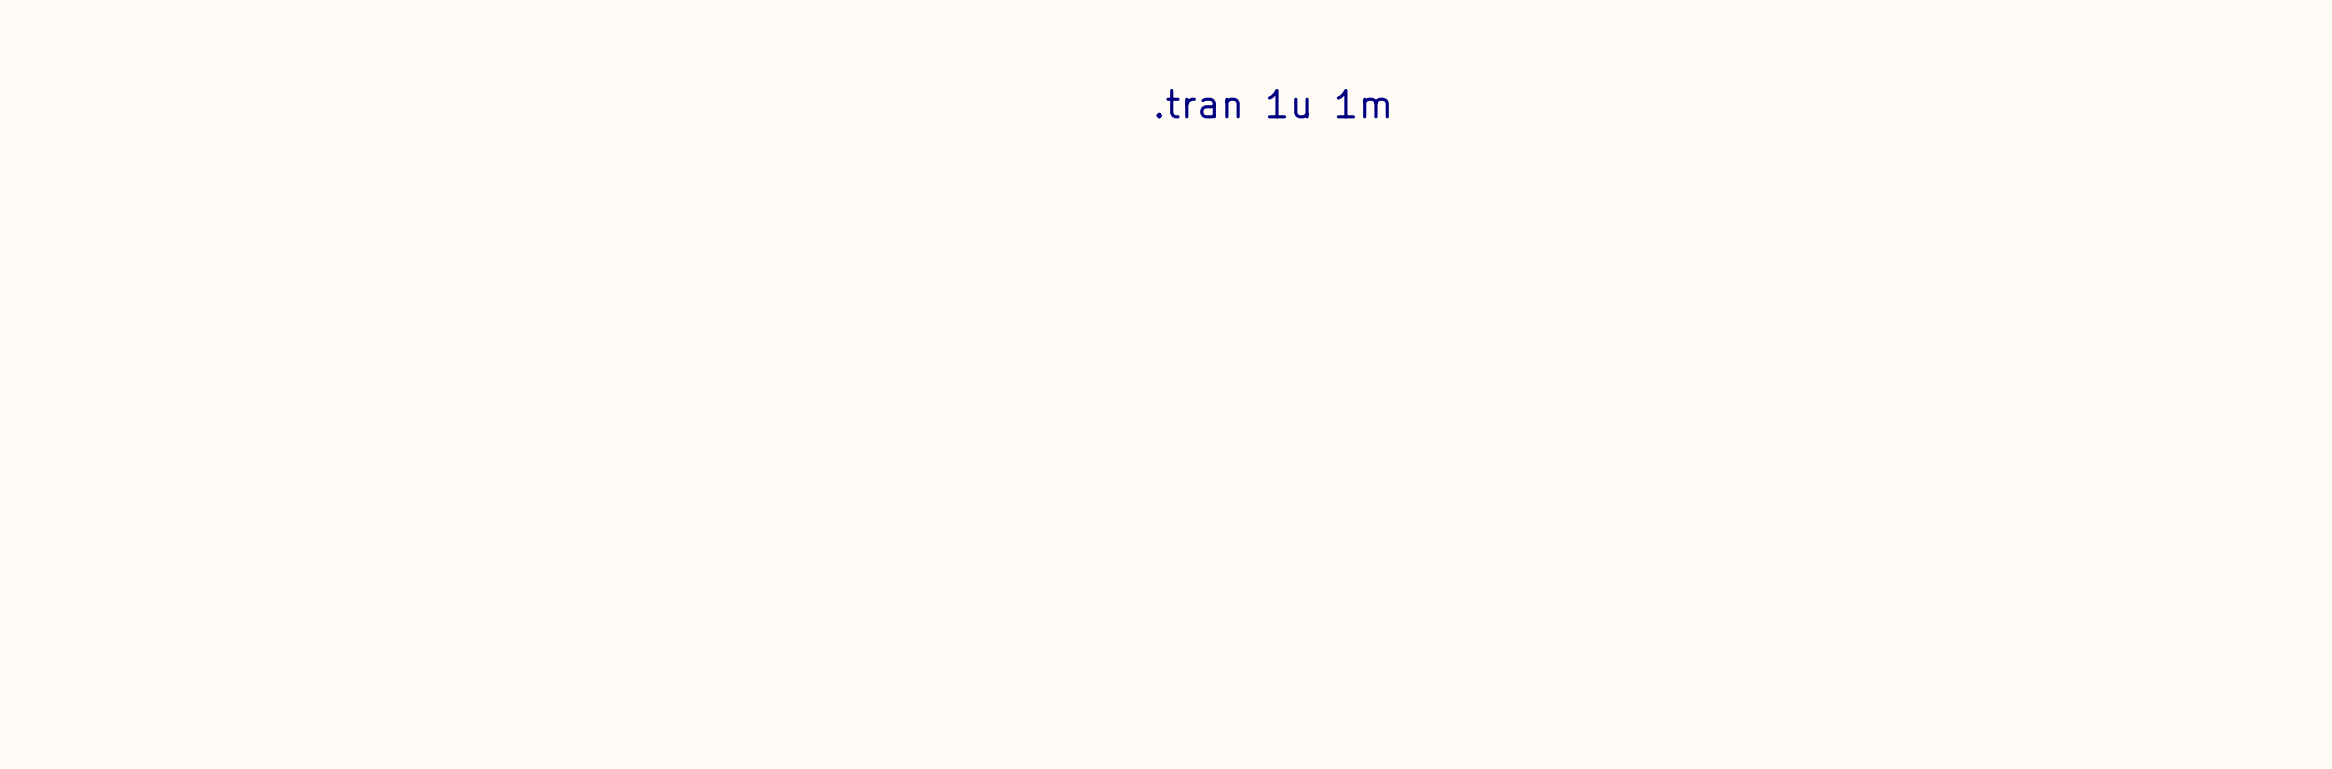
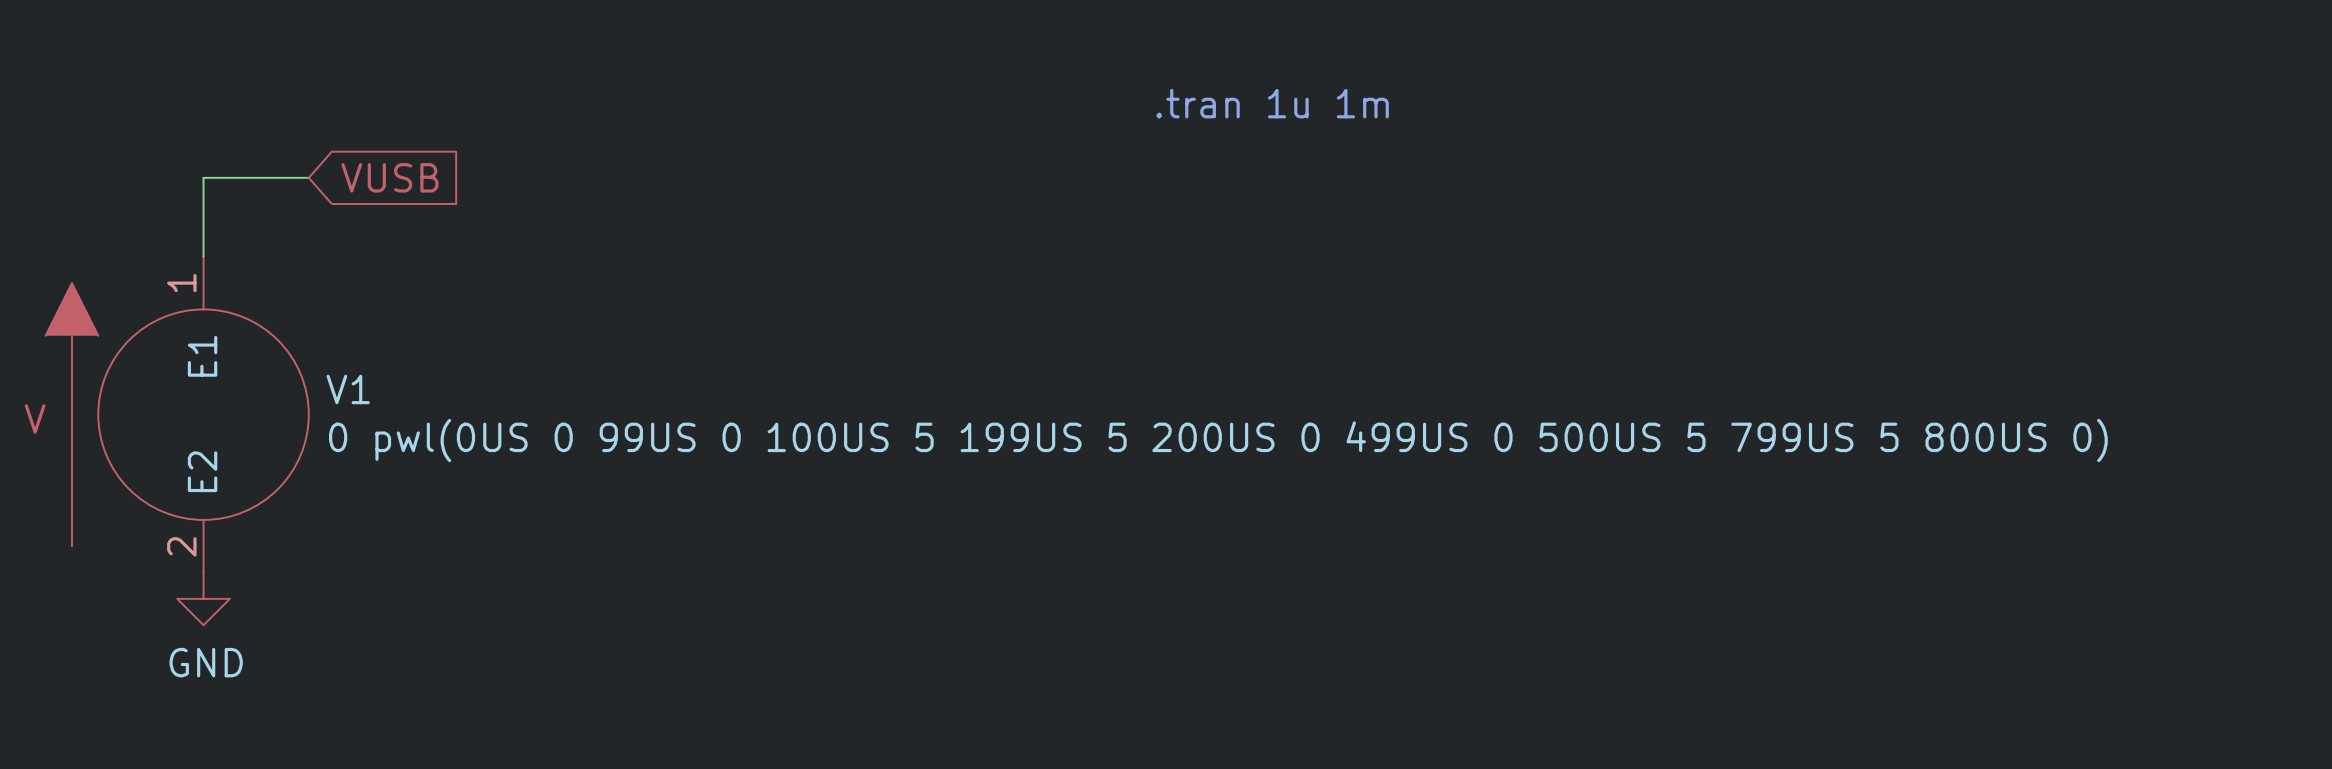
wire: none -> (308, 177) (203, 177) (203, 256)
global label: none -> VUSB (389, 177)
V1: none -> 0 pwl(0US 0 99US 0 100US 5 199US 5 200US 0 499US 0 500US 5 799US 5 800US 0) (177, 414)
power symbol: none -> GND (203, 598)

